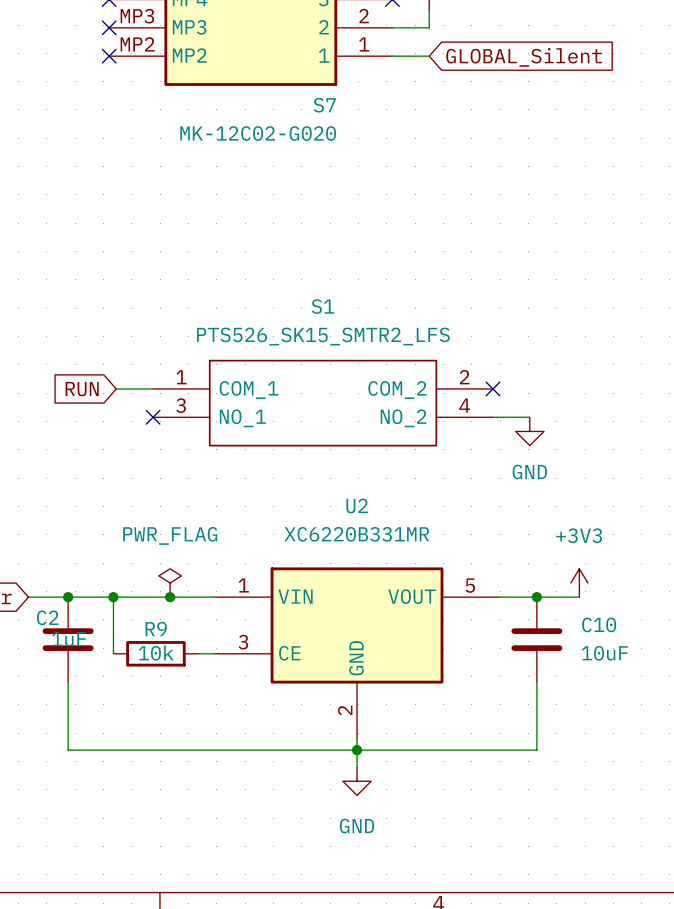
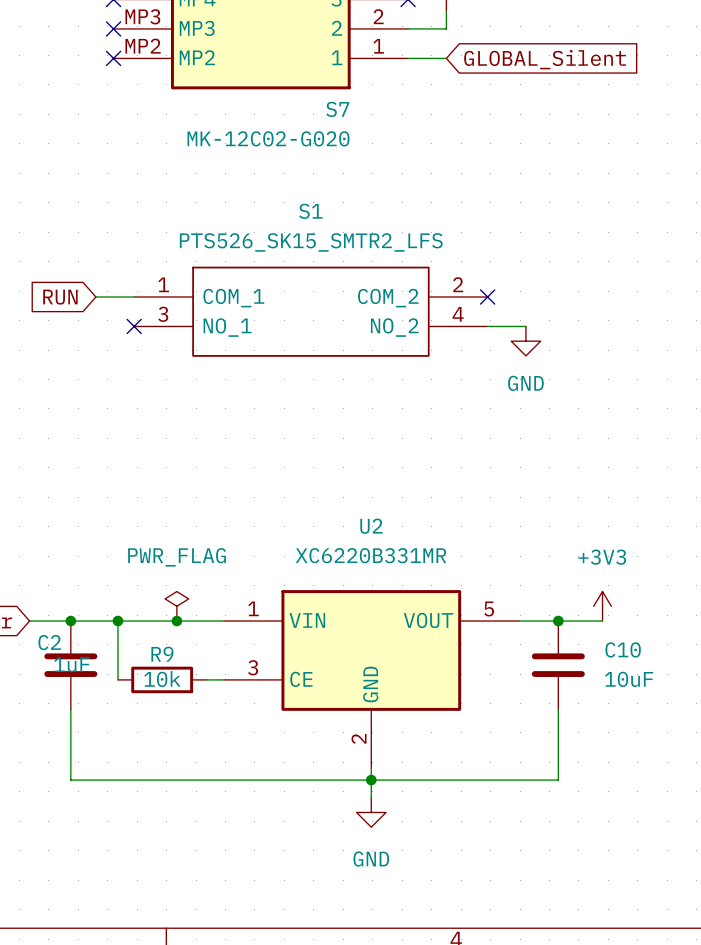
no-connect mark: none -> (487, 297)
no-connect mark: none -> (134, 326)
wire: (116, 388) (153, 388) -> (95, 297) (134, 297)
no-connect mark: (492, 388) -> none
global label position: RUN (82, 389) -> RUN (60, 297)
S1 position: (323, 403) -> (310, 311)
no-connect mark: (153, 417) -> none
wire: (492, 417) (529, 417) -> (487, 326) (525, 326)
power symbol position: GND (529, 431) -> GND (525, 341)

